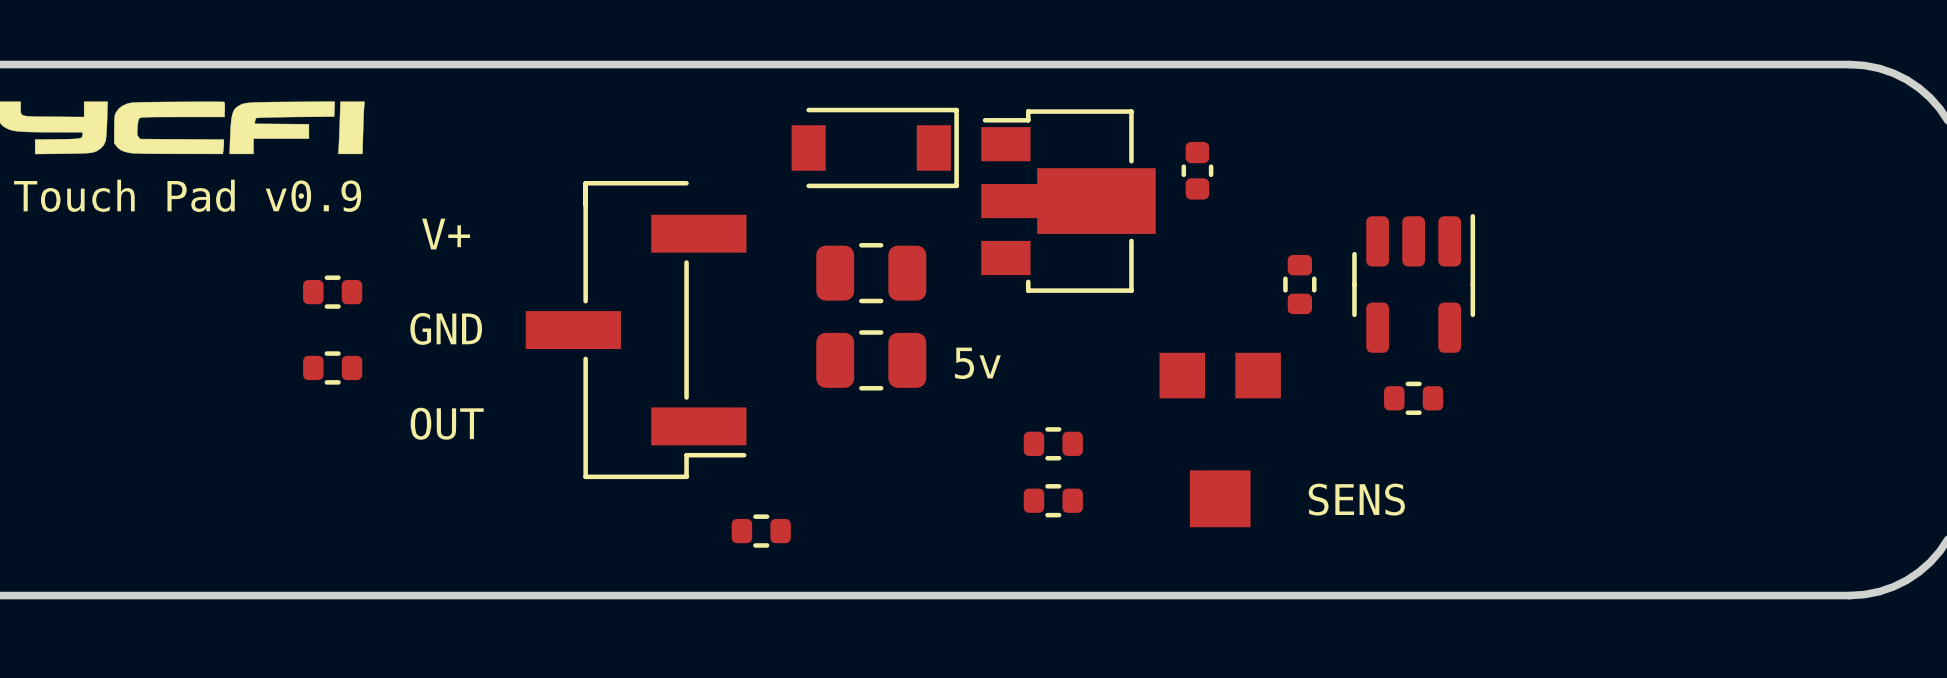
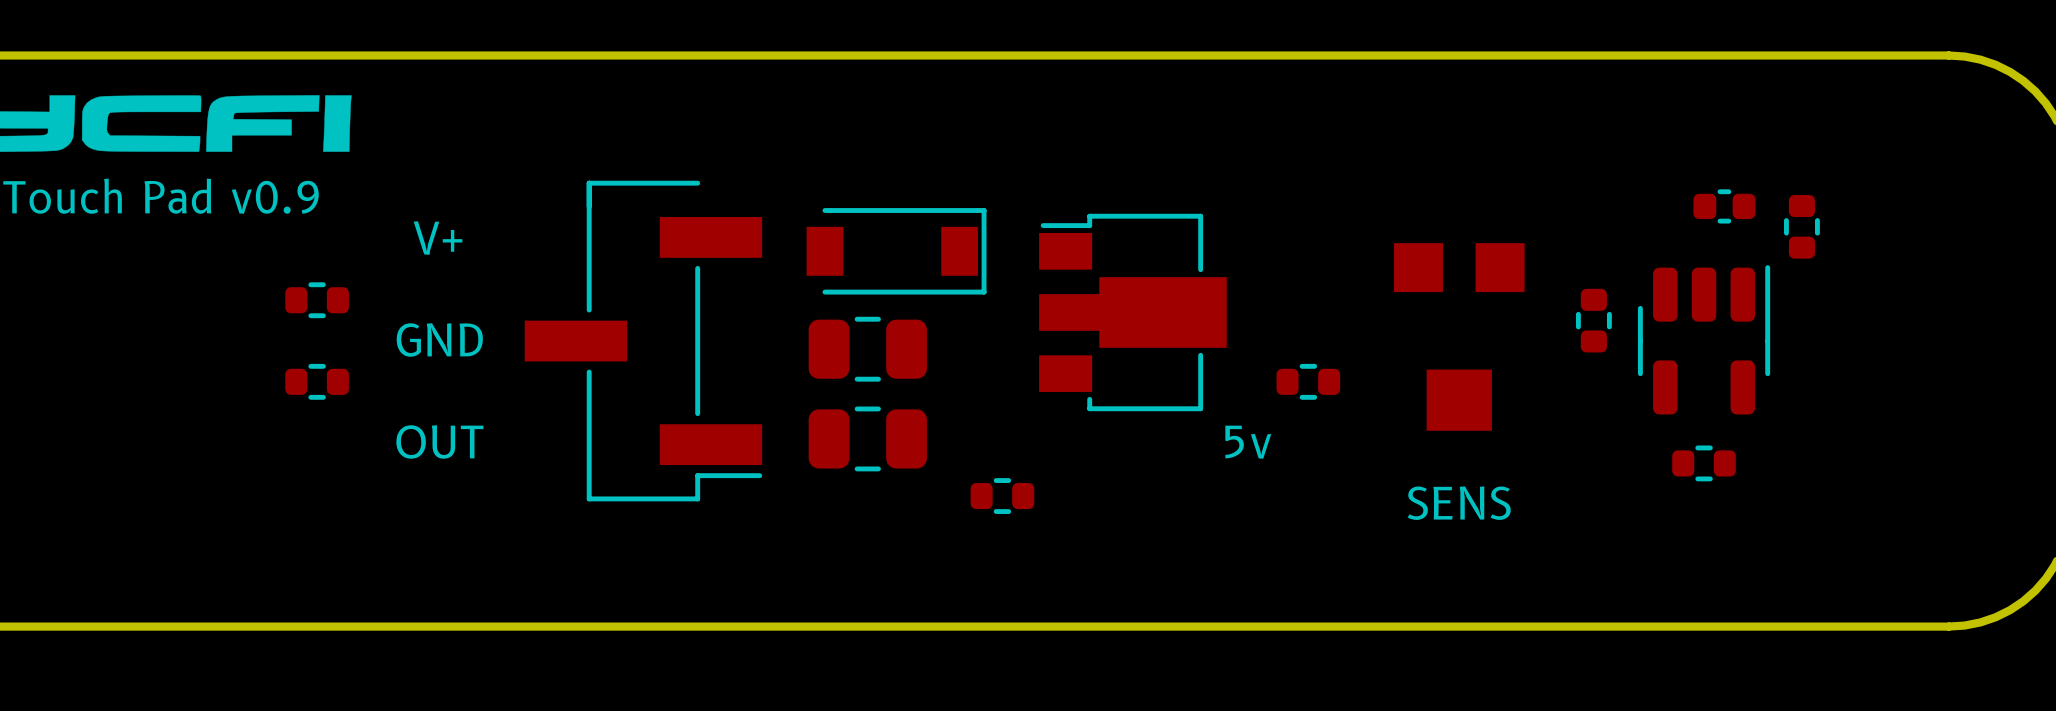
part: (875, 147) -> none
part rotation: 0° (1197, 170) -> 90° clockwise (1724, 206)
part position: (1197, 170) -> (1724, 206)
part position: (1068, 201) -> (1132, 312)
part: none -> (1801, 226)
part footprint: [816, 242, 927, 304] -> [806, 208, 987, 295]
part position: (1413, 283) -> (1704, 339)
part: (1299, 284) -> none
part: none -> (1593, 320)
part: none -> (867, 349)
part: (871, 360) -> none
text position: 5v (977, 363) -> 5v (1248, 442)
part: none -> (1308, 381)
part: (1413, 398) -> none
part: none -> (867, 438)
part position: (1220, 440) -> (1459, 336)
part: (1053, 443) -> none
part: none -> (1704, 463)
part: none -> (1002, 496)
text position: SENS (1356, 499) -> SENS (1459, 503)
part: (1053, 500) -> none
part: (761, 531) -> none

